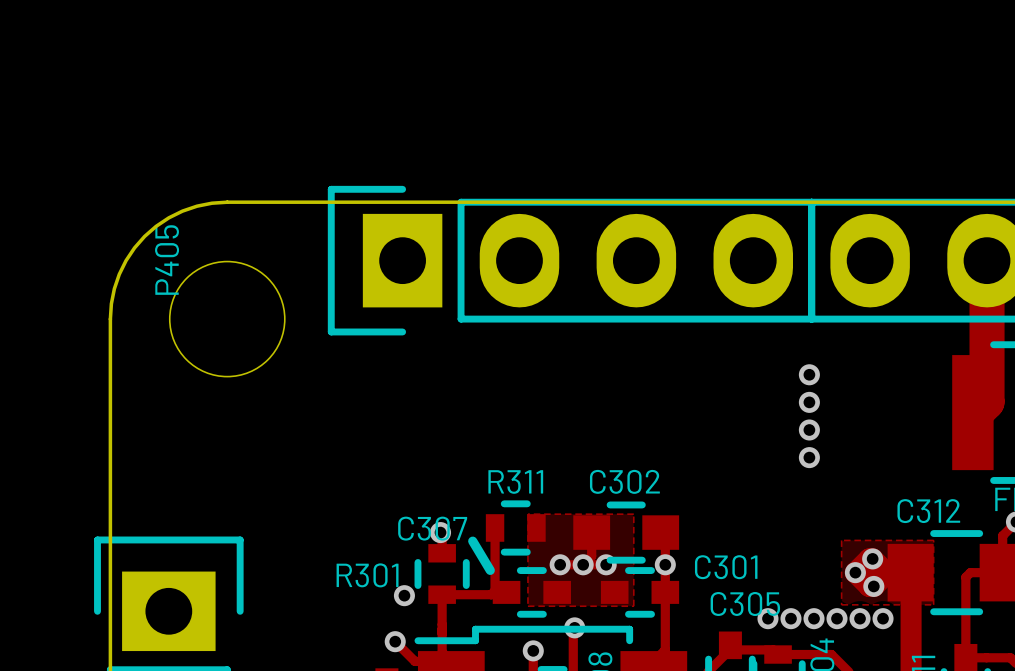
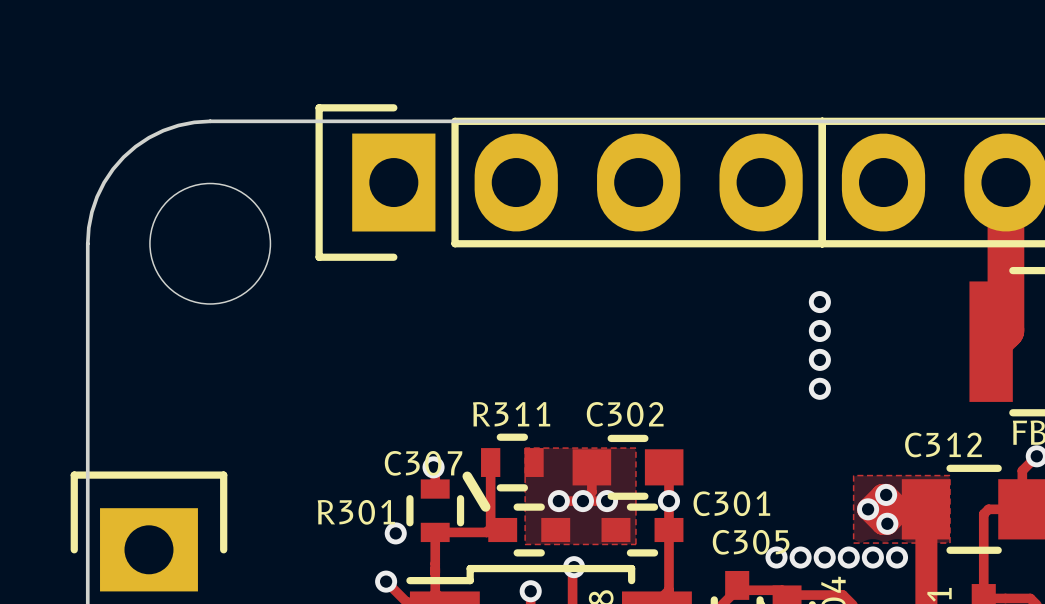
P405 name: P405 (167, 260) -> none

